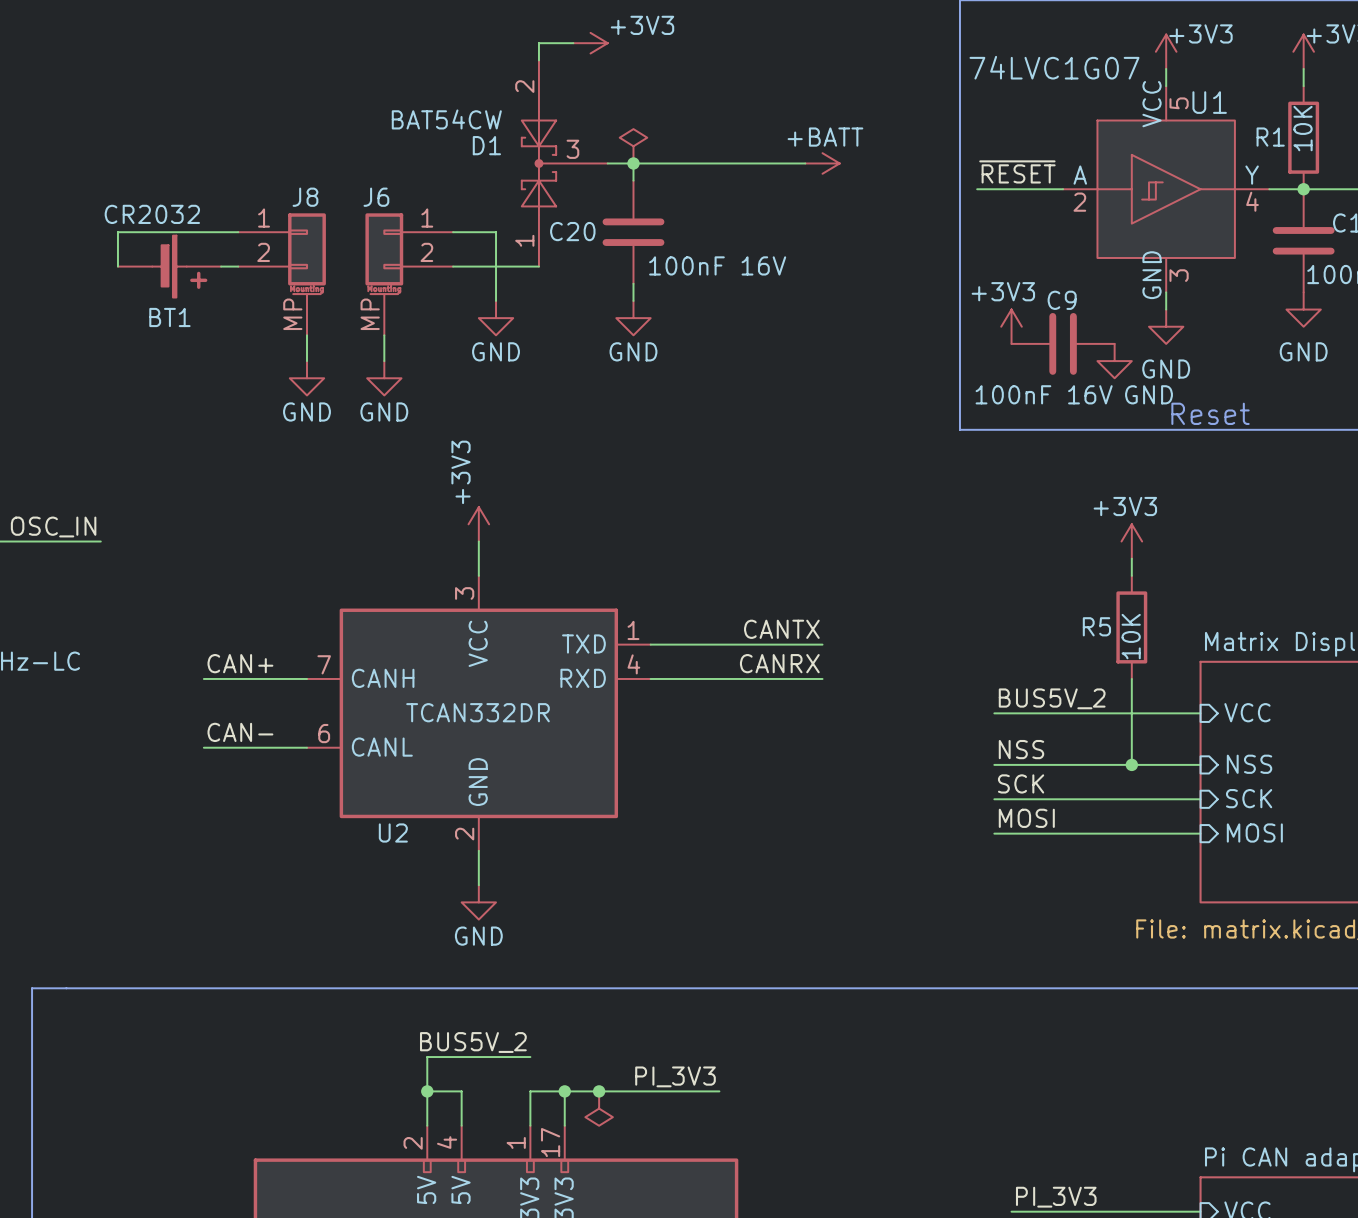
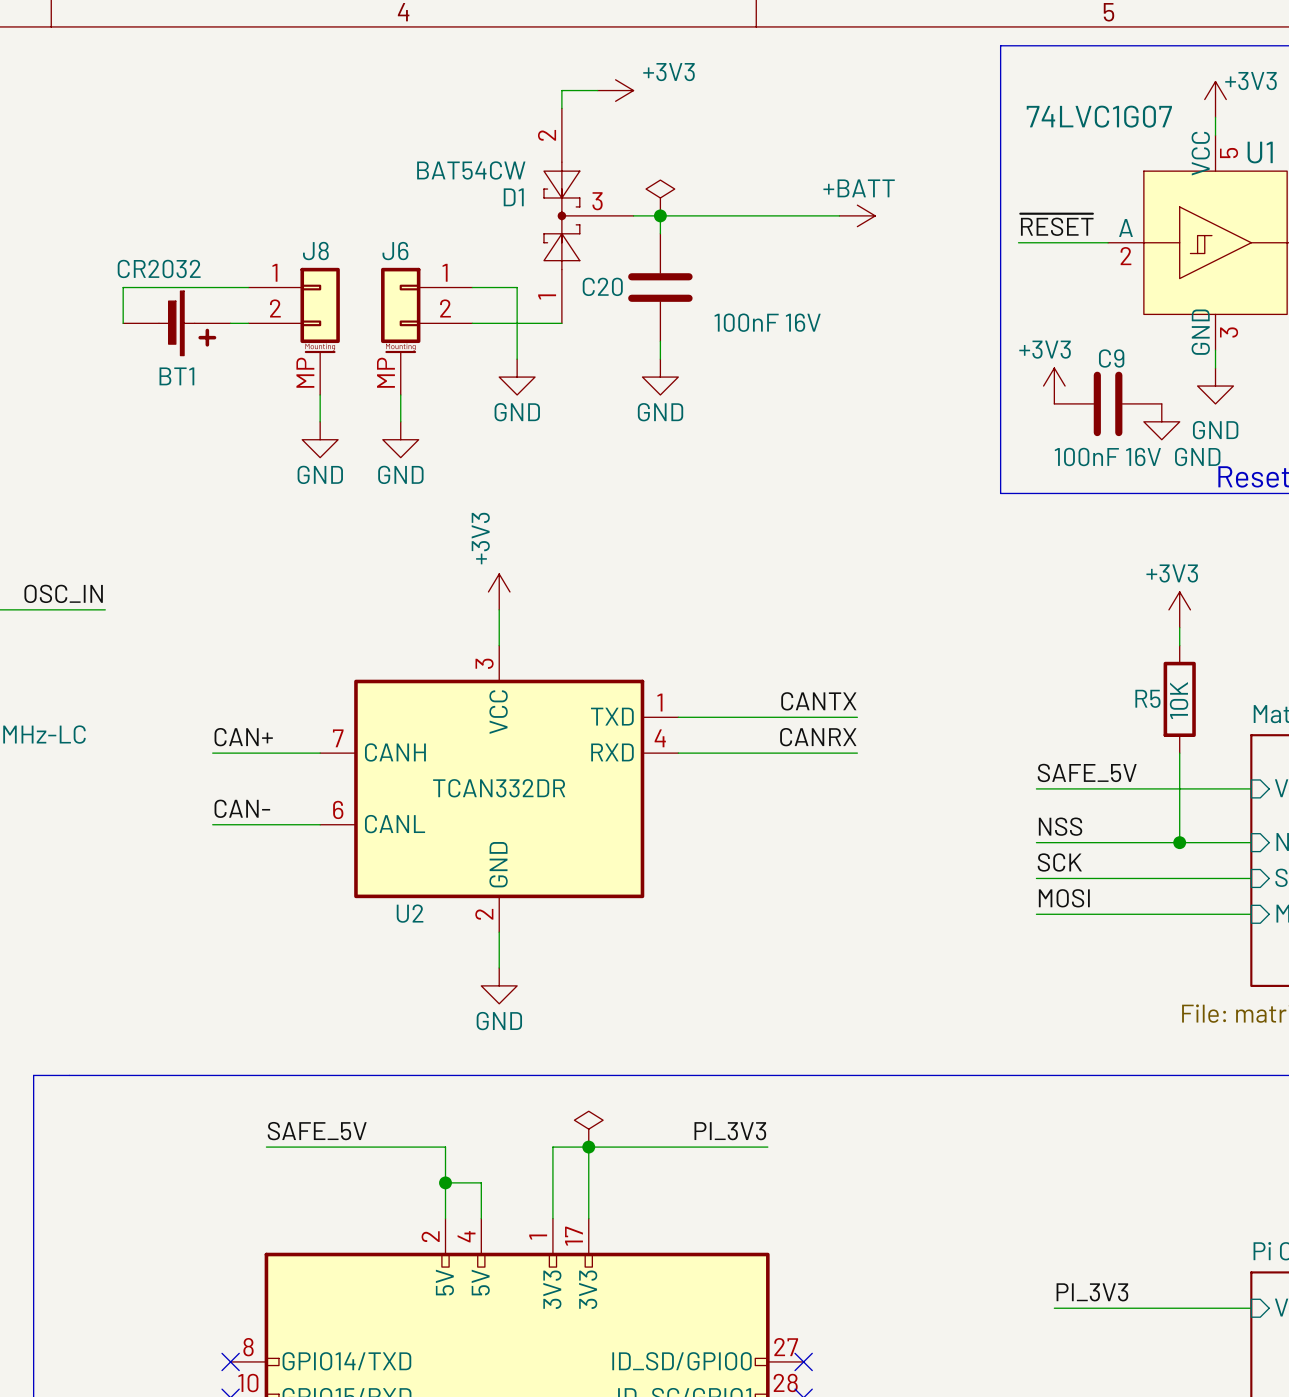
label: BUS5V_2 (1052, 698) -> SAFE_5V (1087, 772)
label: none -> SAFE_5V (317, 1131)
label: BUS5V_2 (473, 1042) -> none
wire: (427, 1057) (530, 1057) -> (445, 1147) (266, 1147)
wire: none -> (588, 1147) (588, 1182)
junction: none -> (588, 1147)
label position: PI_3V3 (675, 1076) -> PI_3V3 (730, 1131)
wire: (530, 1091) (719, 1091) -> (552, 1182) (552, 1147) (767, 1147)
junction: (564, 1091) -> none
junction: (599, 1091) -> none
power symbol rotation: 0° (599, 1108) -> 180° (588, 1129)
power symbol position: (599, 1108) -> (588, 1129)

